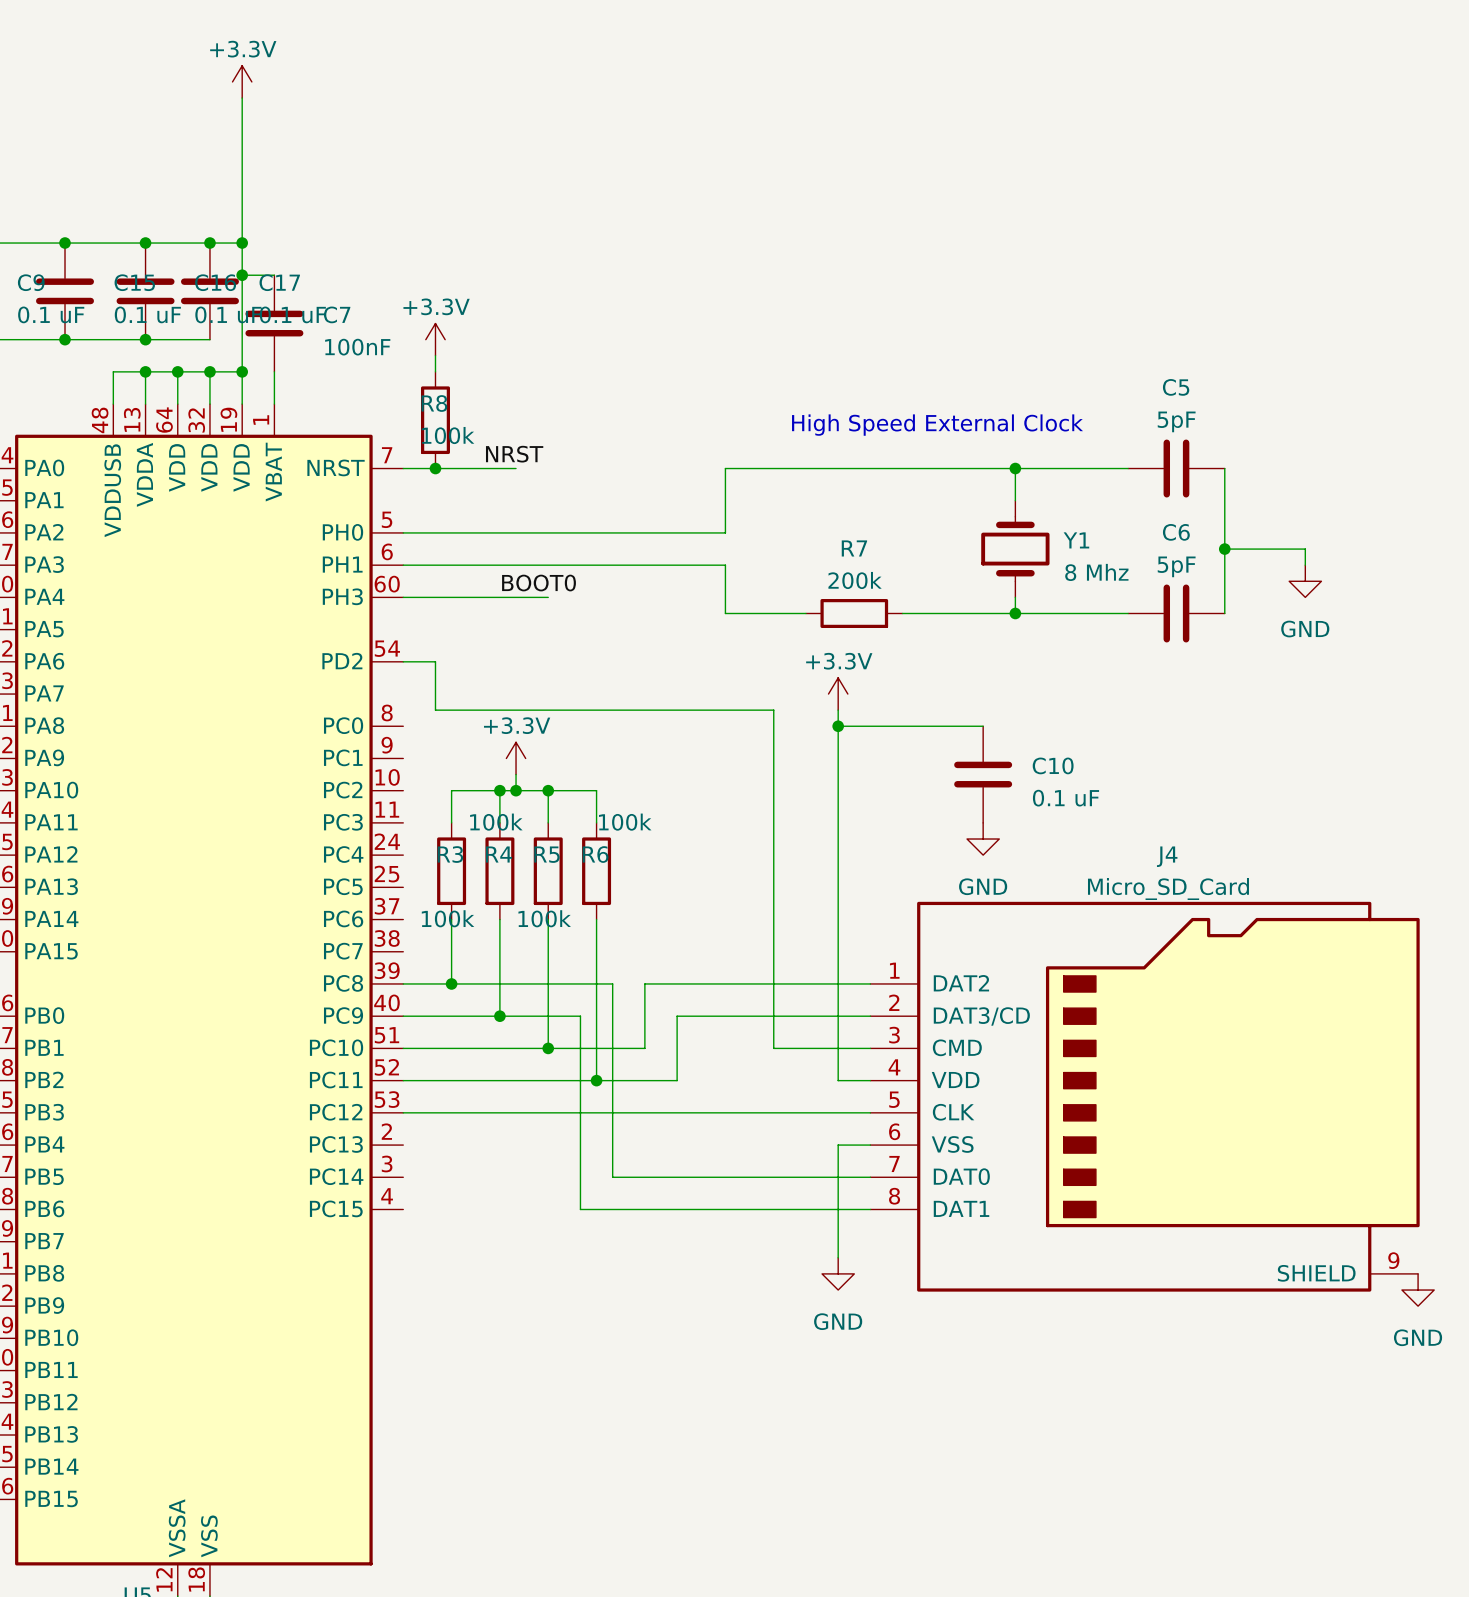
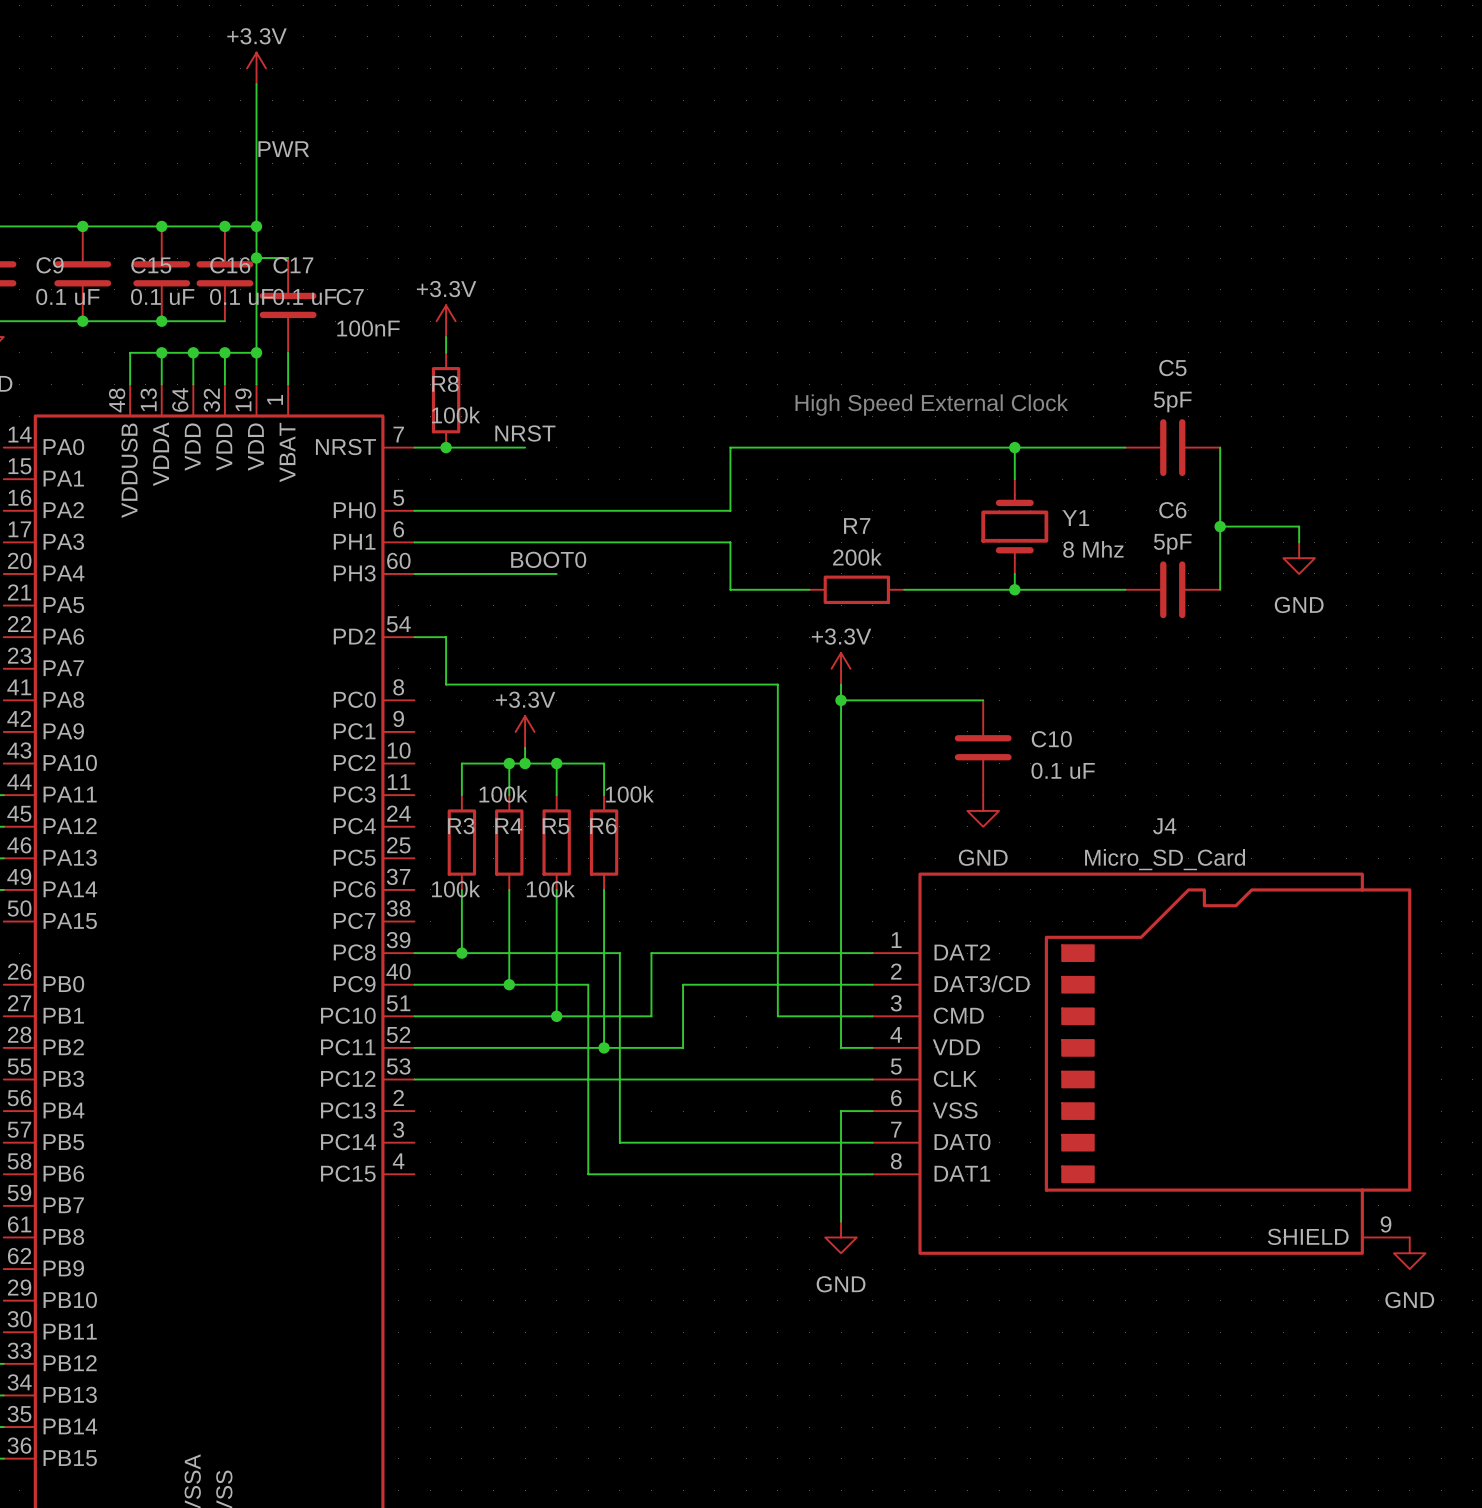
label: none -> PWR (283, 149)

